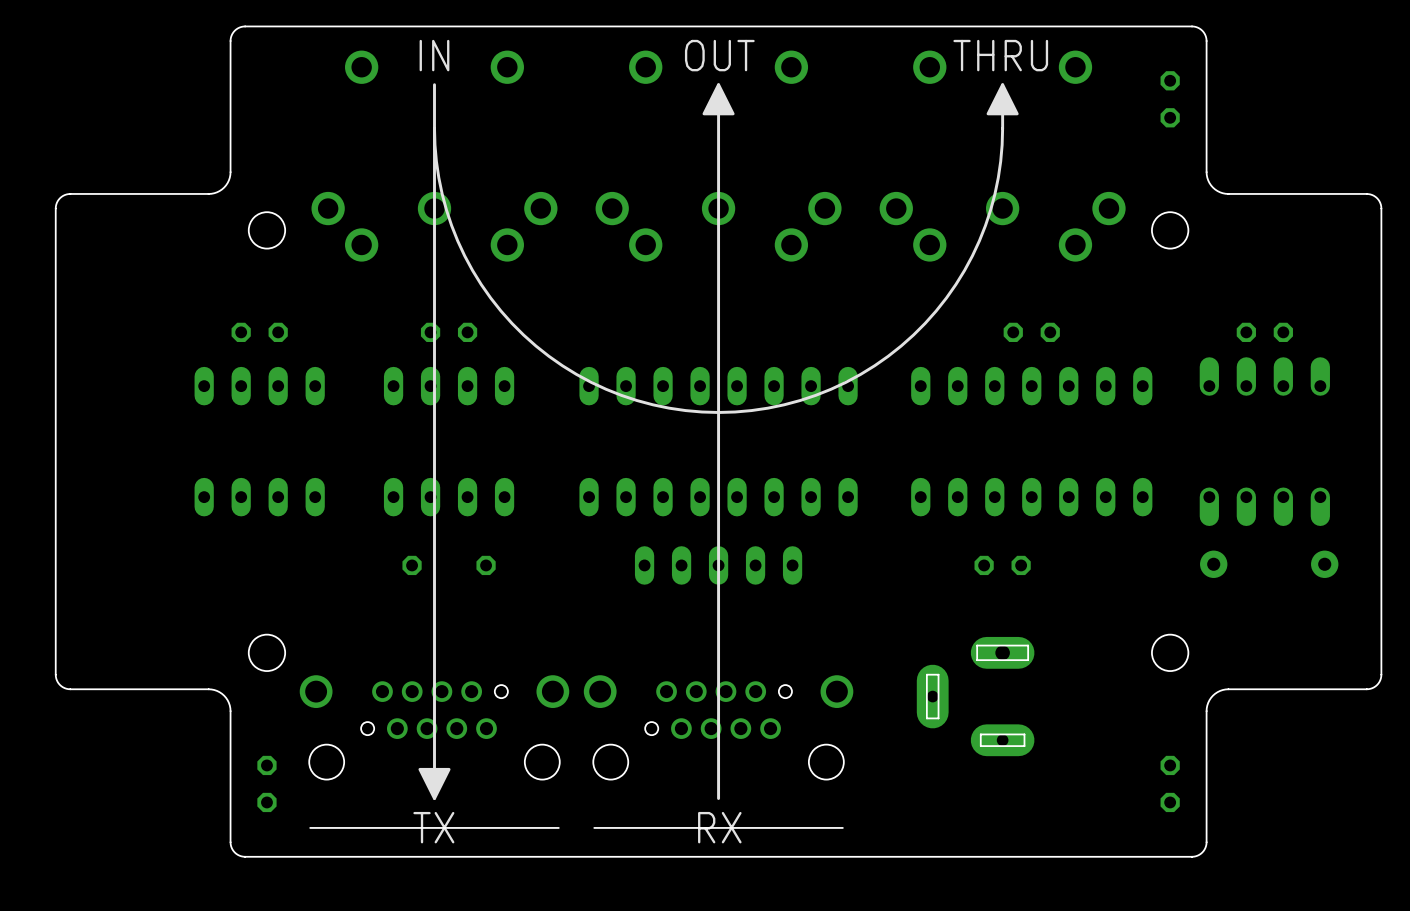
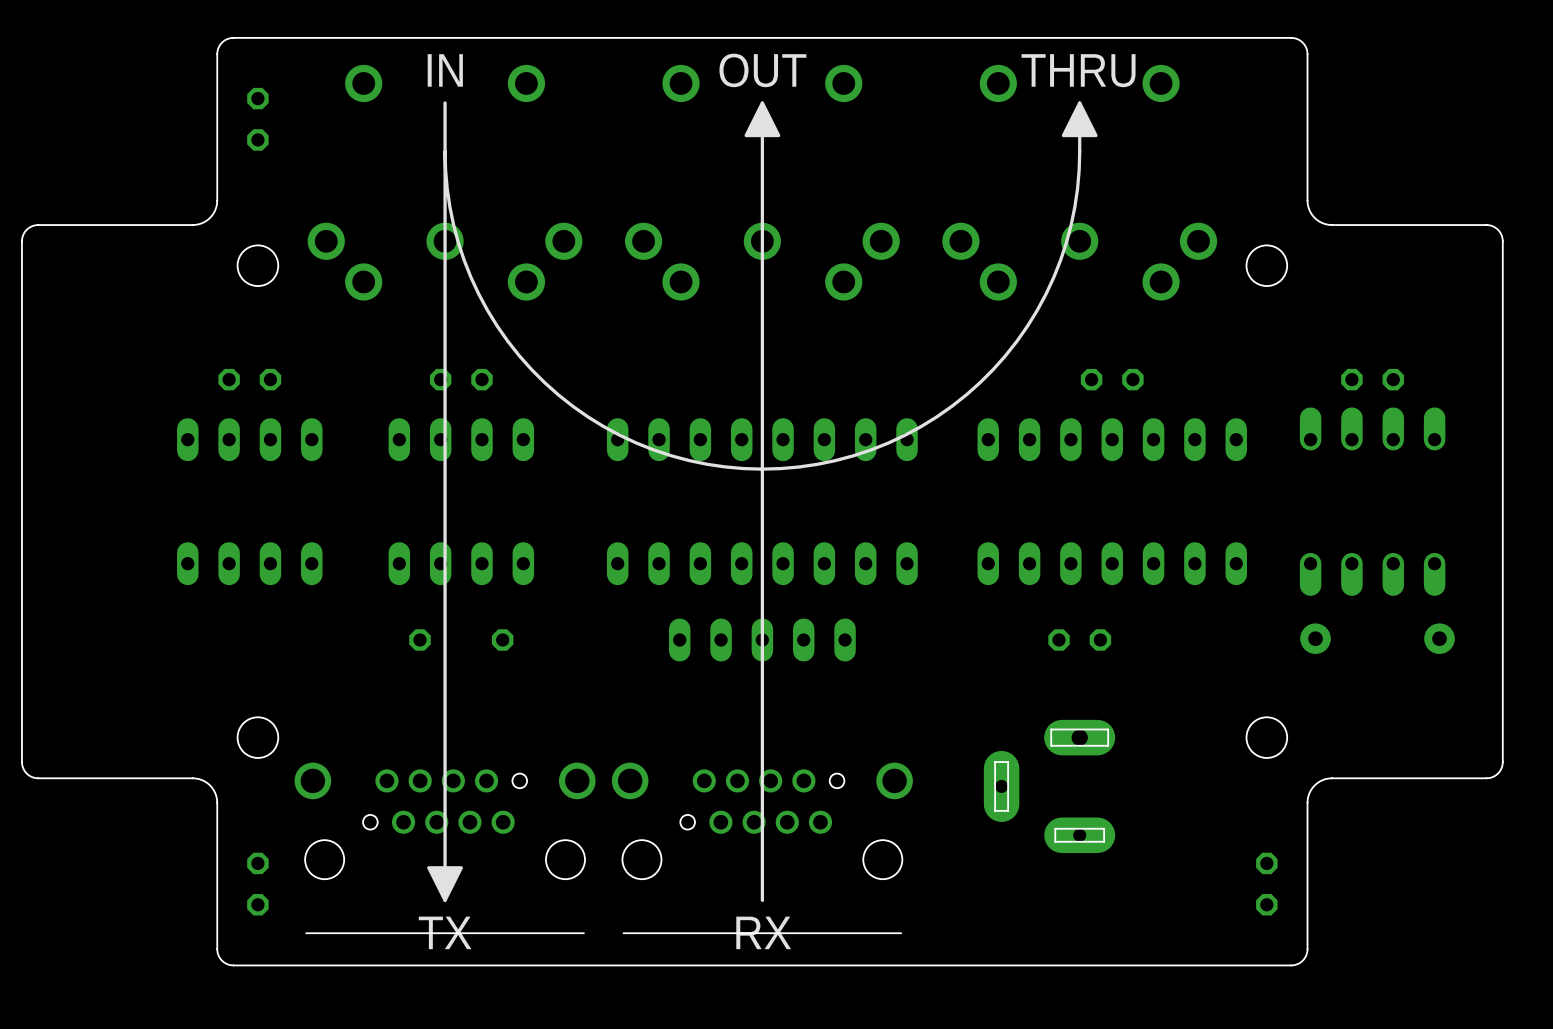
part: none -> (257, 119)
part: (1170, 99) -> none

